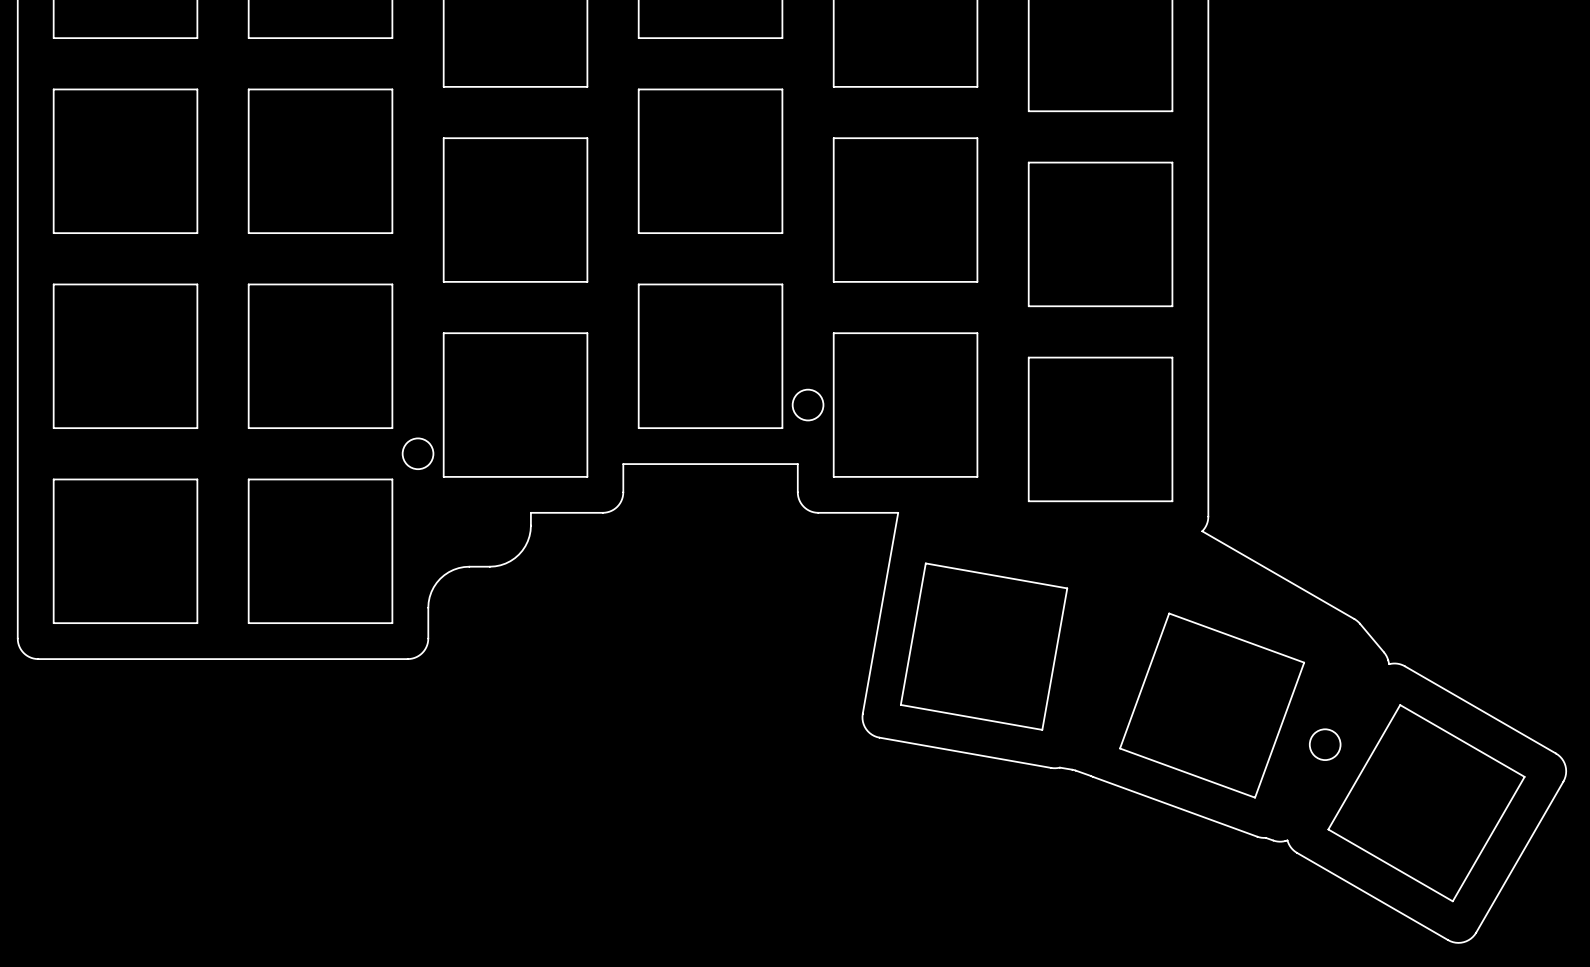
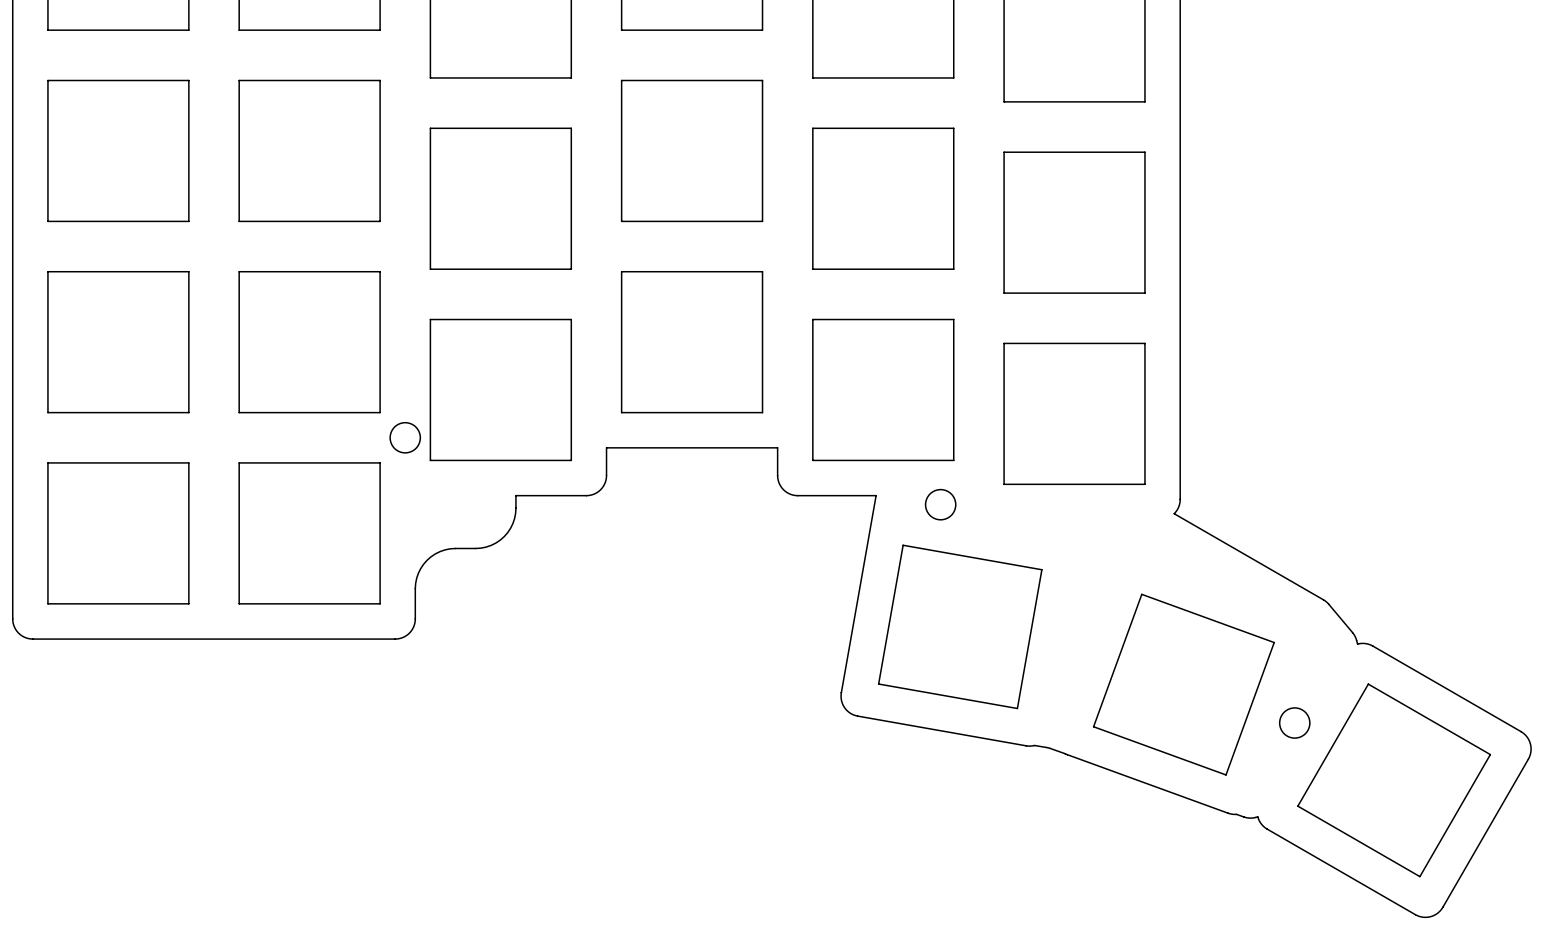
round board edge position: (808, 405) -> (940, 504)

